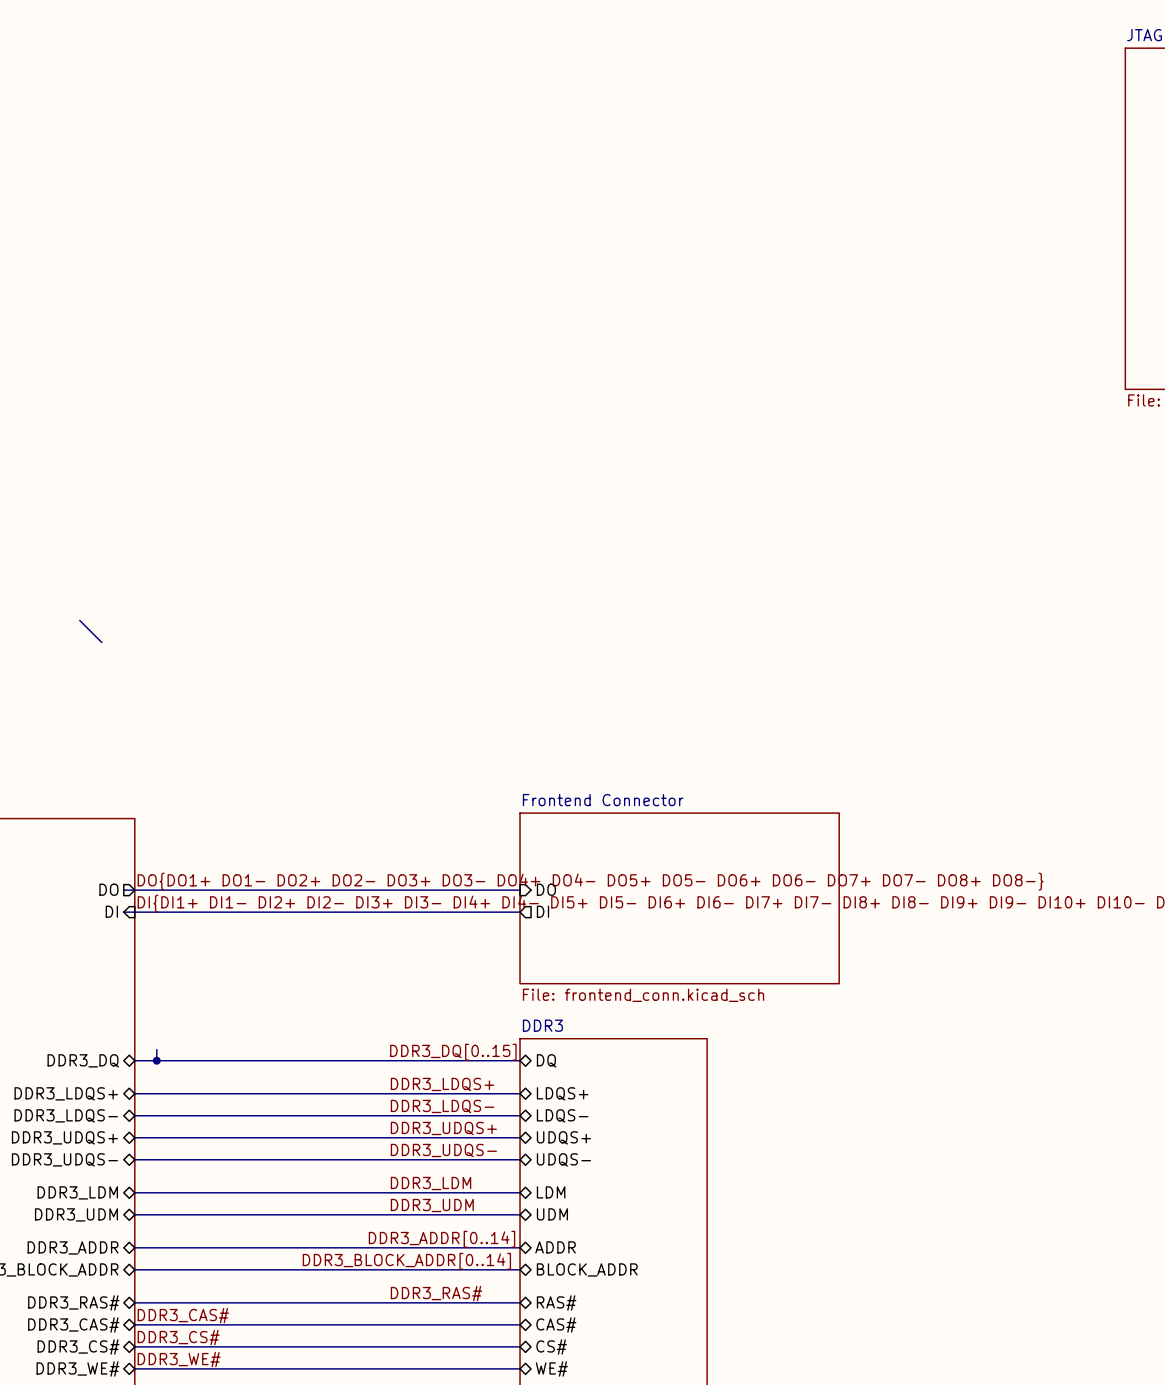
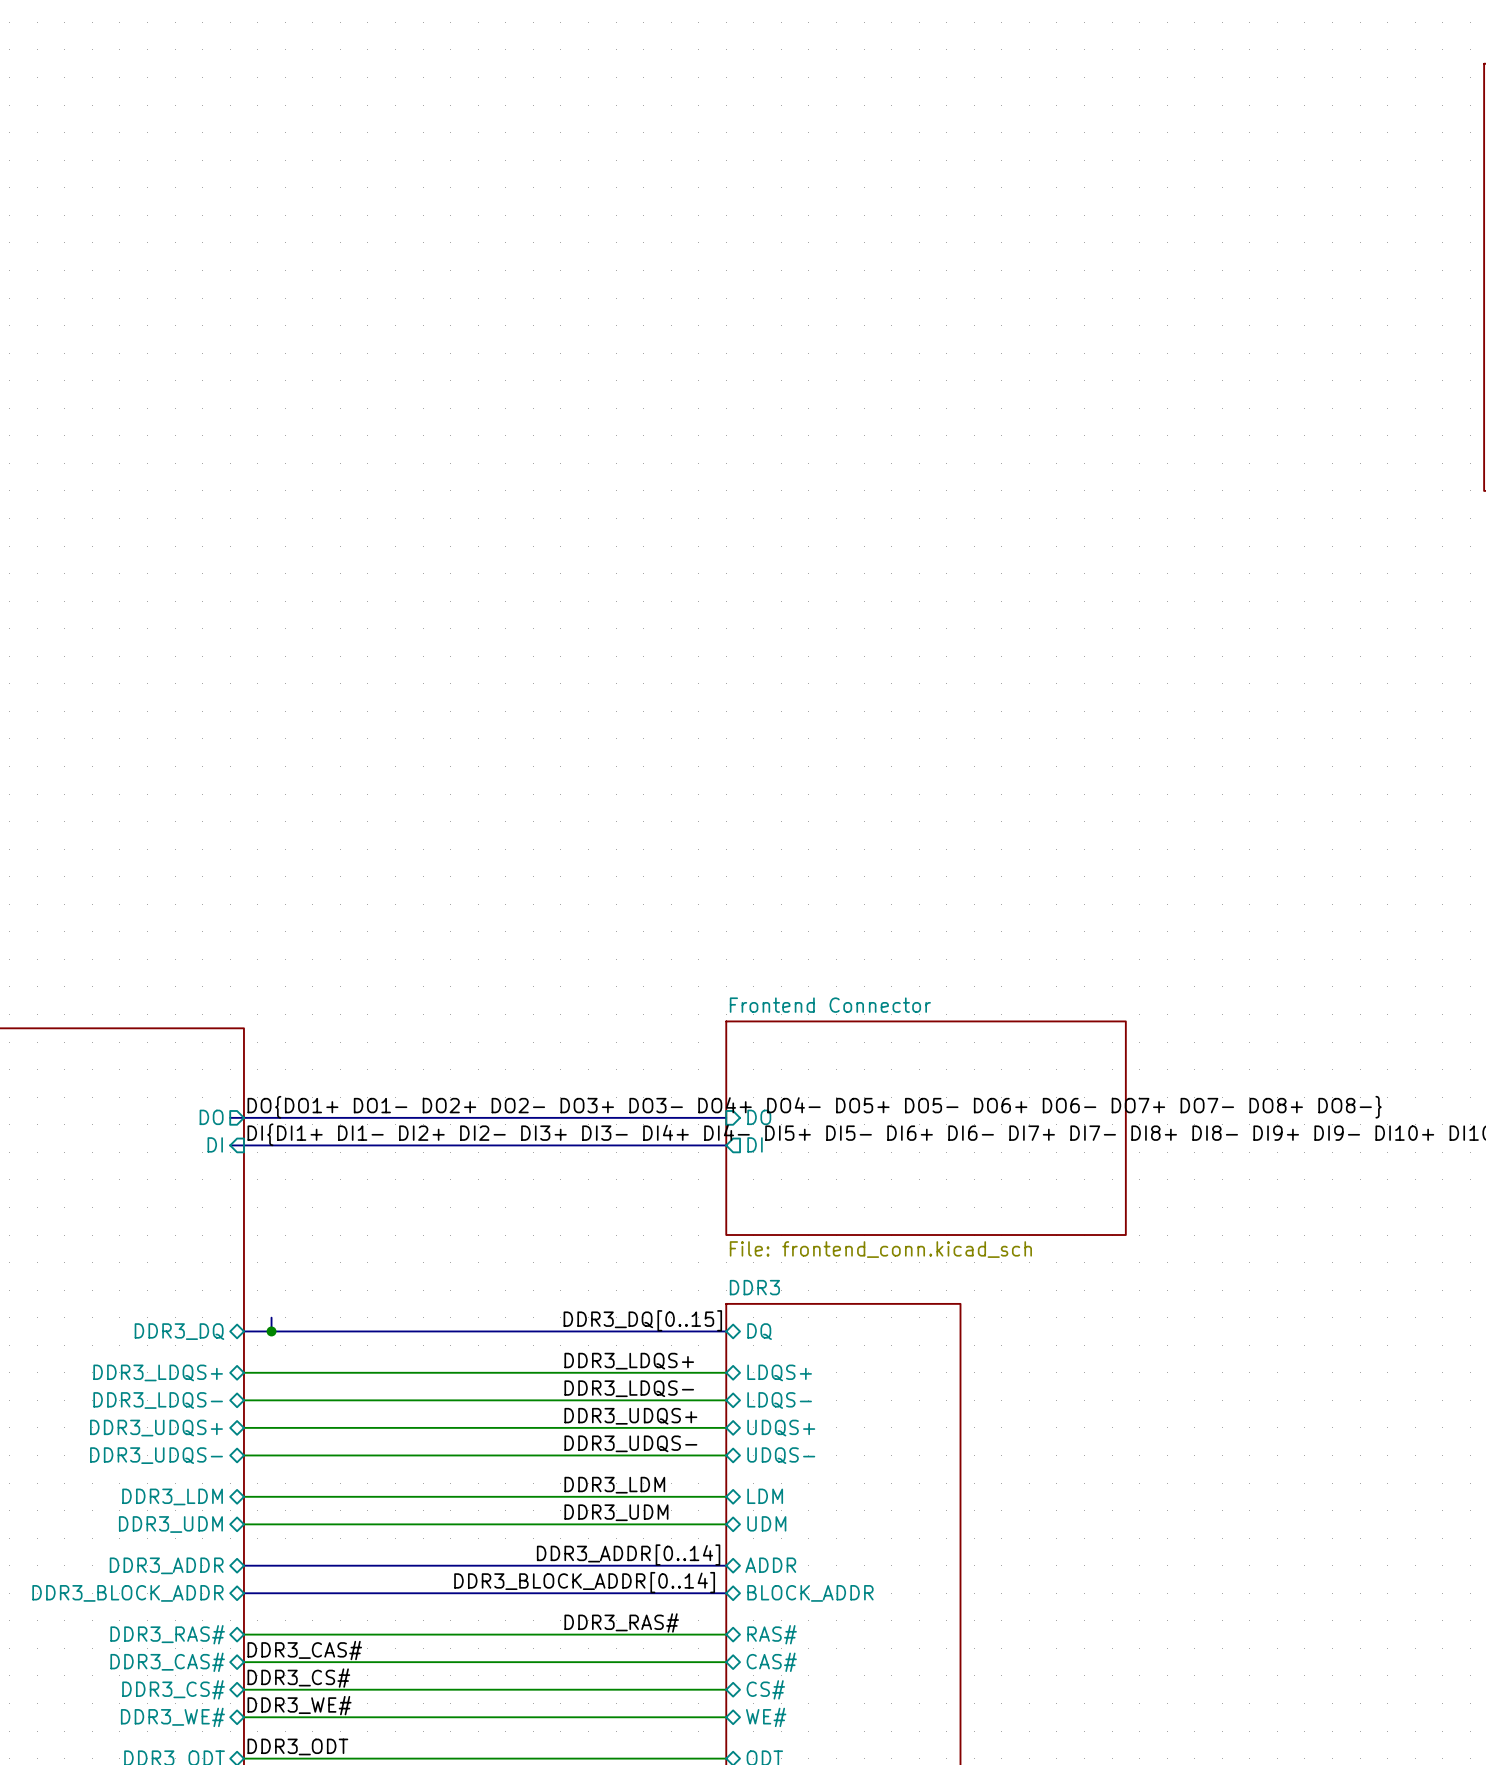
wire: (79, 620) (101, 642) -> none

